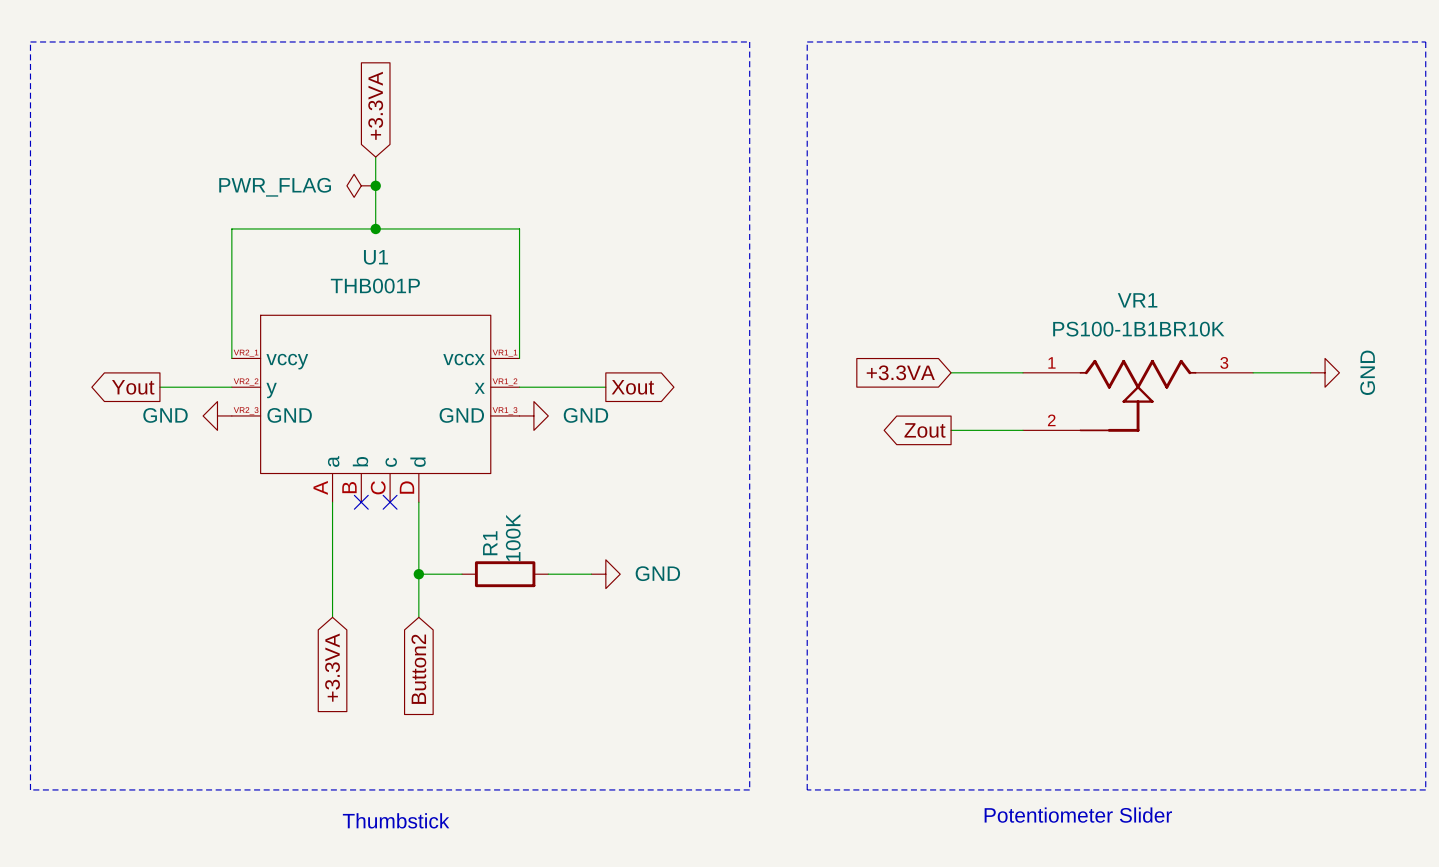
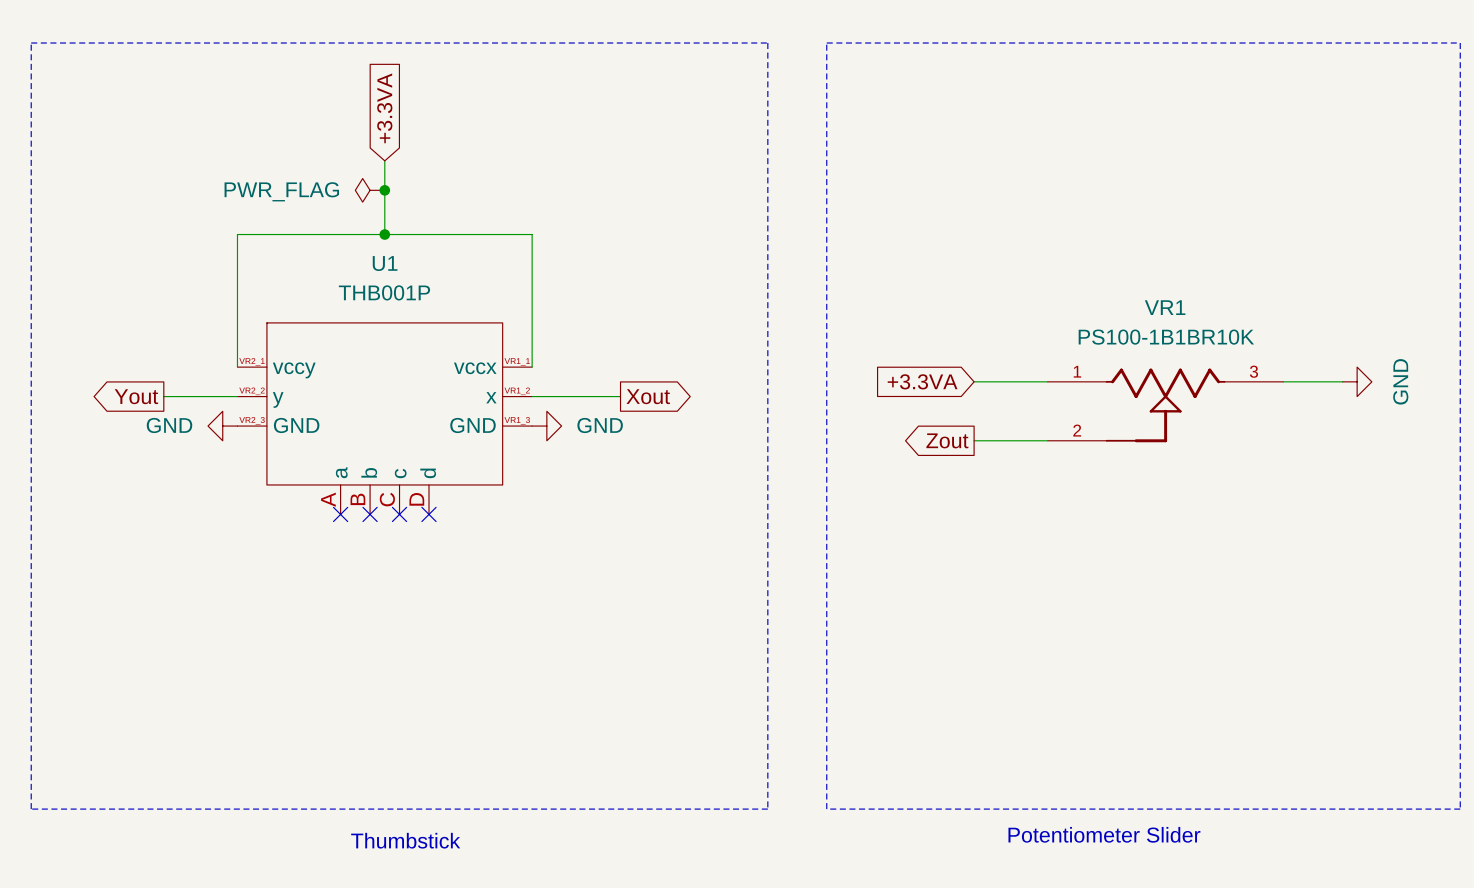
wire: (332, 502) (332, 617) -> none
no-connect mark: none -> (340, 514)
wire: (418, 502) (418, 617) -> none
no-connect mark: none -> (428, 514)
wire: (418, 574) (462, 574) -> none
junction: (418, 574) -> none
R1: 100K (505, 574) -> none
wire: (548, 574) (591, 574) -> none
power symbol: GND (605, 574) -> none
global label: +3.3VA (332, 667) -> none
global label: Button2 (418, 669) -> none

